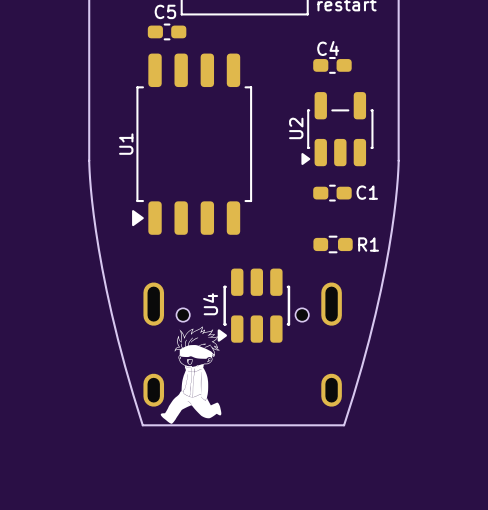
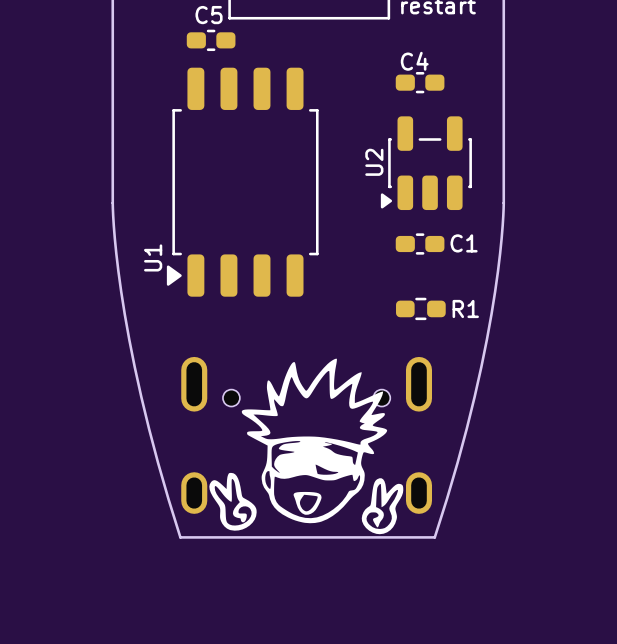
U1 name position: U1 (126, 144) -> U1 (153, 257)
drawing: none -> [209, 358, 404, 535]
U4: (253, 305) -> none
drawing: [160, 326, 222, 424] -> none

